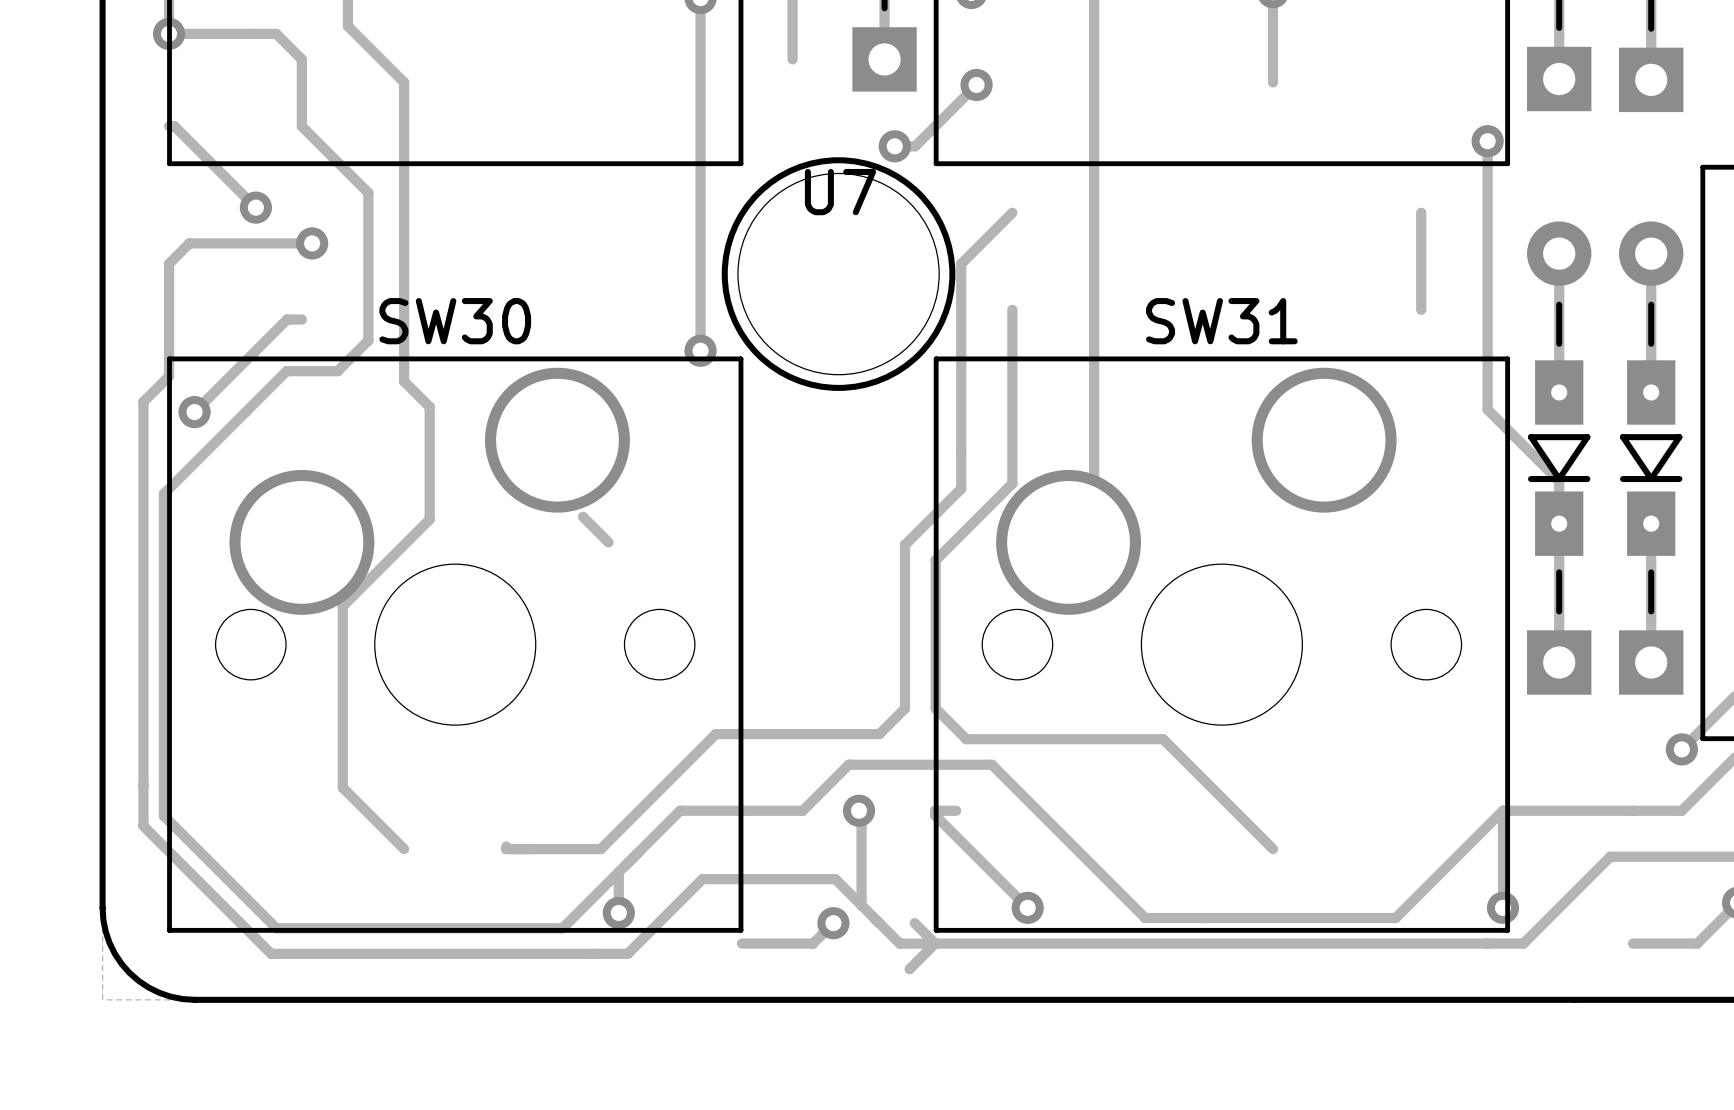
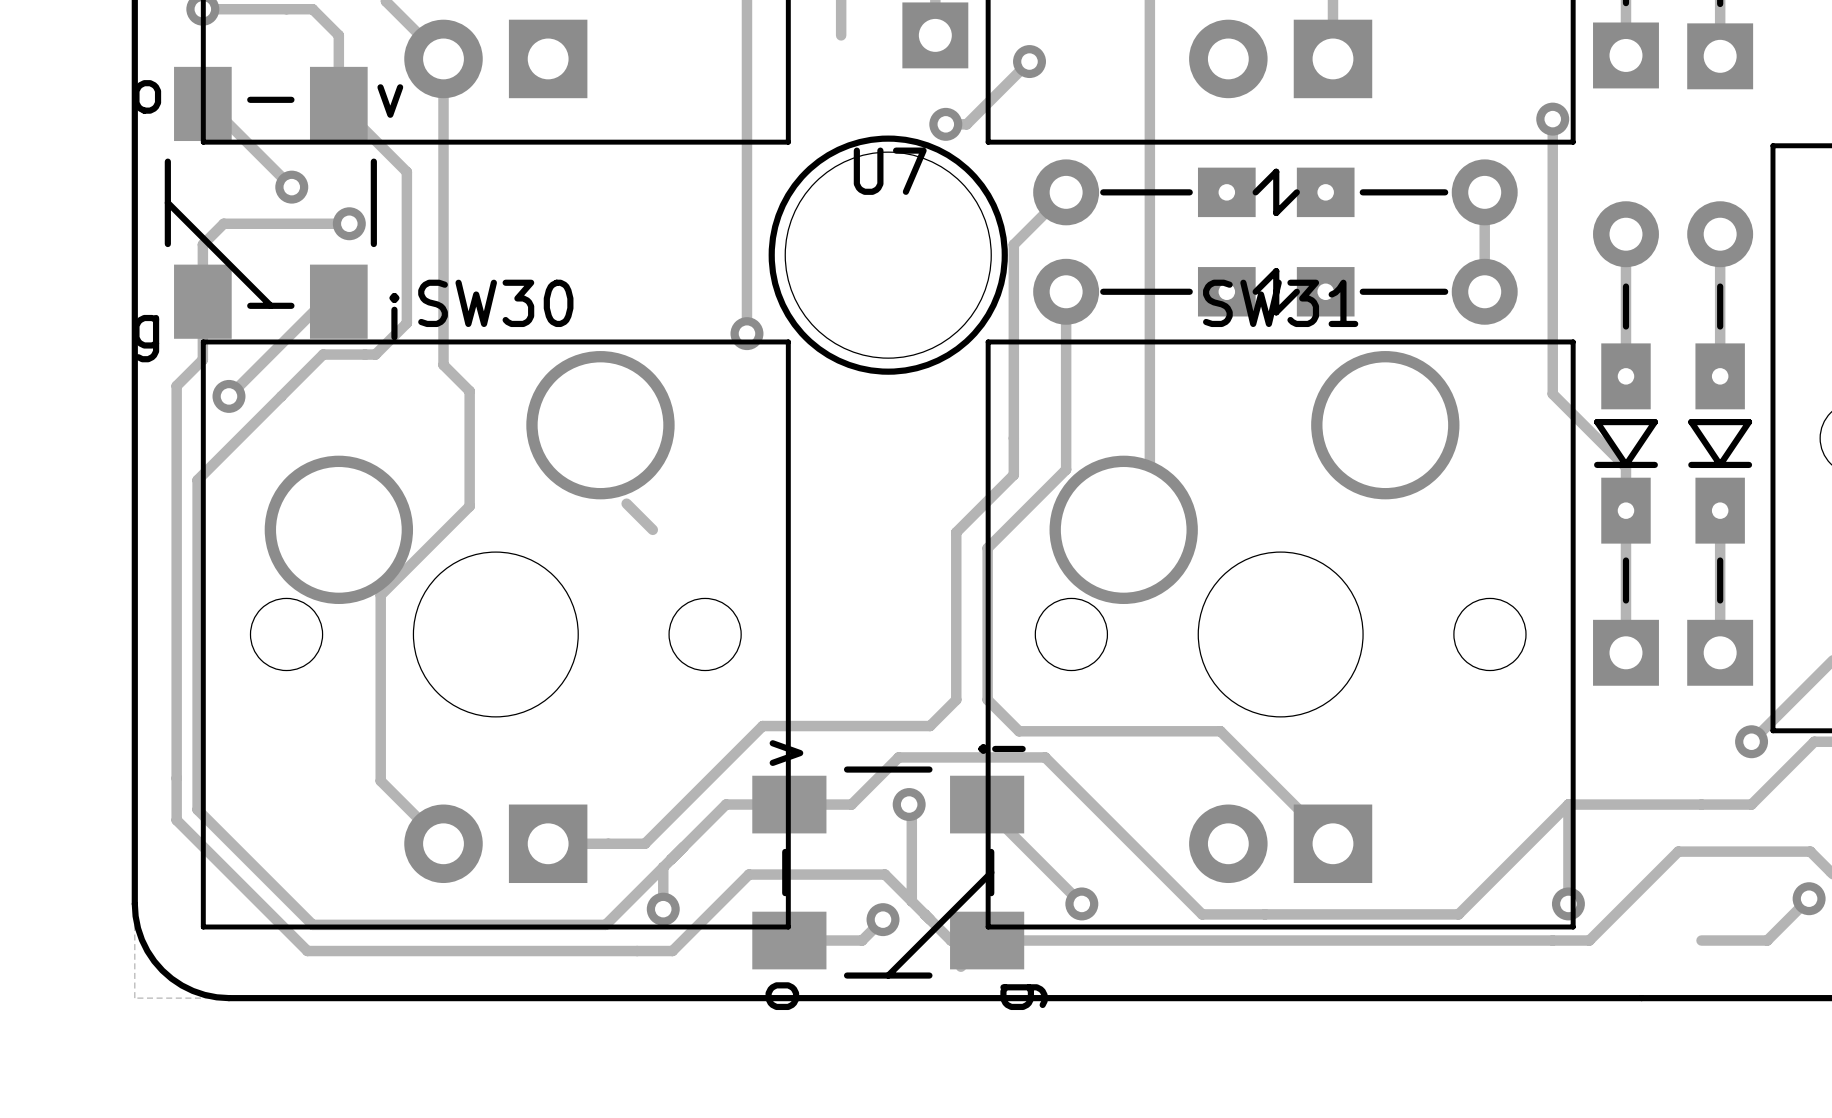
part: none -> (495, 58)
part: none -> (1280, 58)
part: none -> (1275, 192)
part: none -> (270, 202)
part: none -> (1275, 291)
part: none -> (495, 843)
part: none -> (1280, 843)
part: none -> (888, 872)

